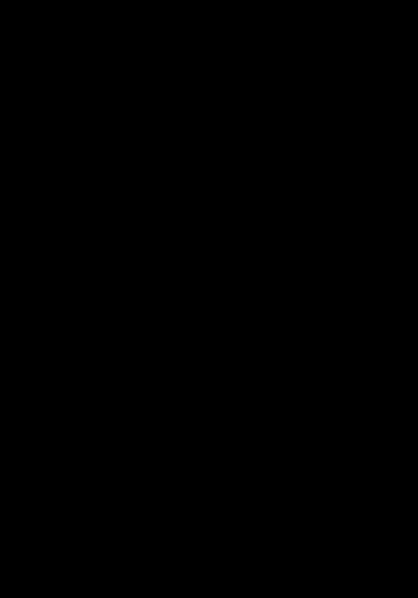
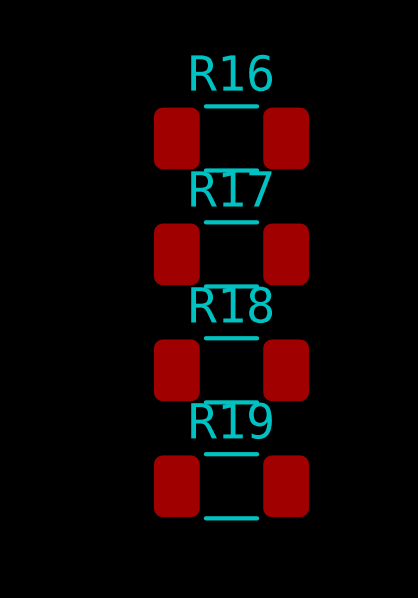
R16: none -> (231, 138)
R17: none -> (231, 254)
R18: none -> (231, 370)
R19: none -> (231, 486)

